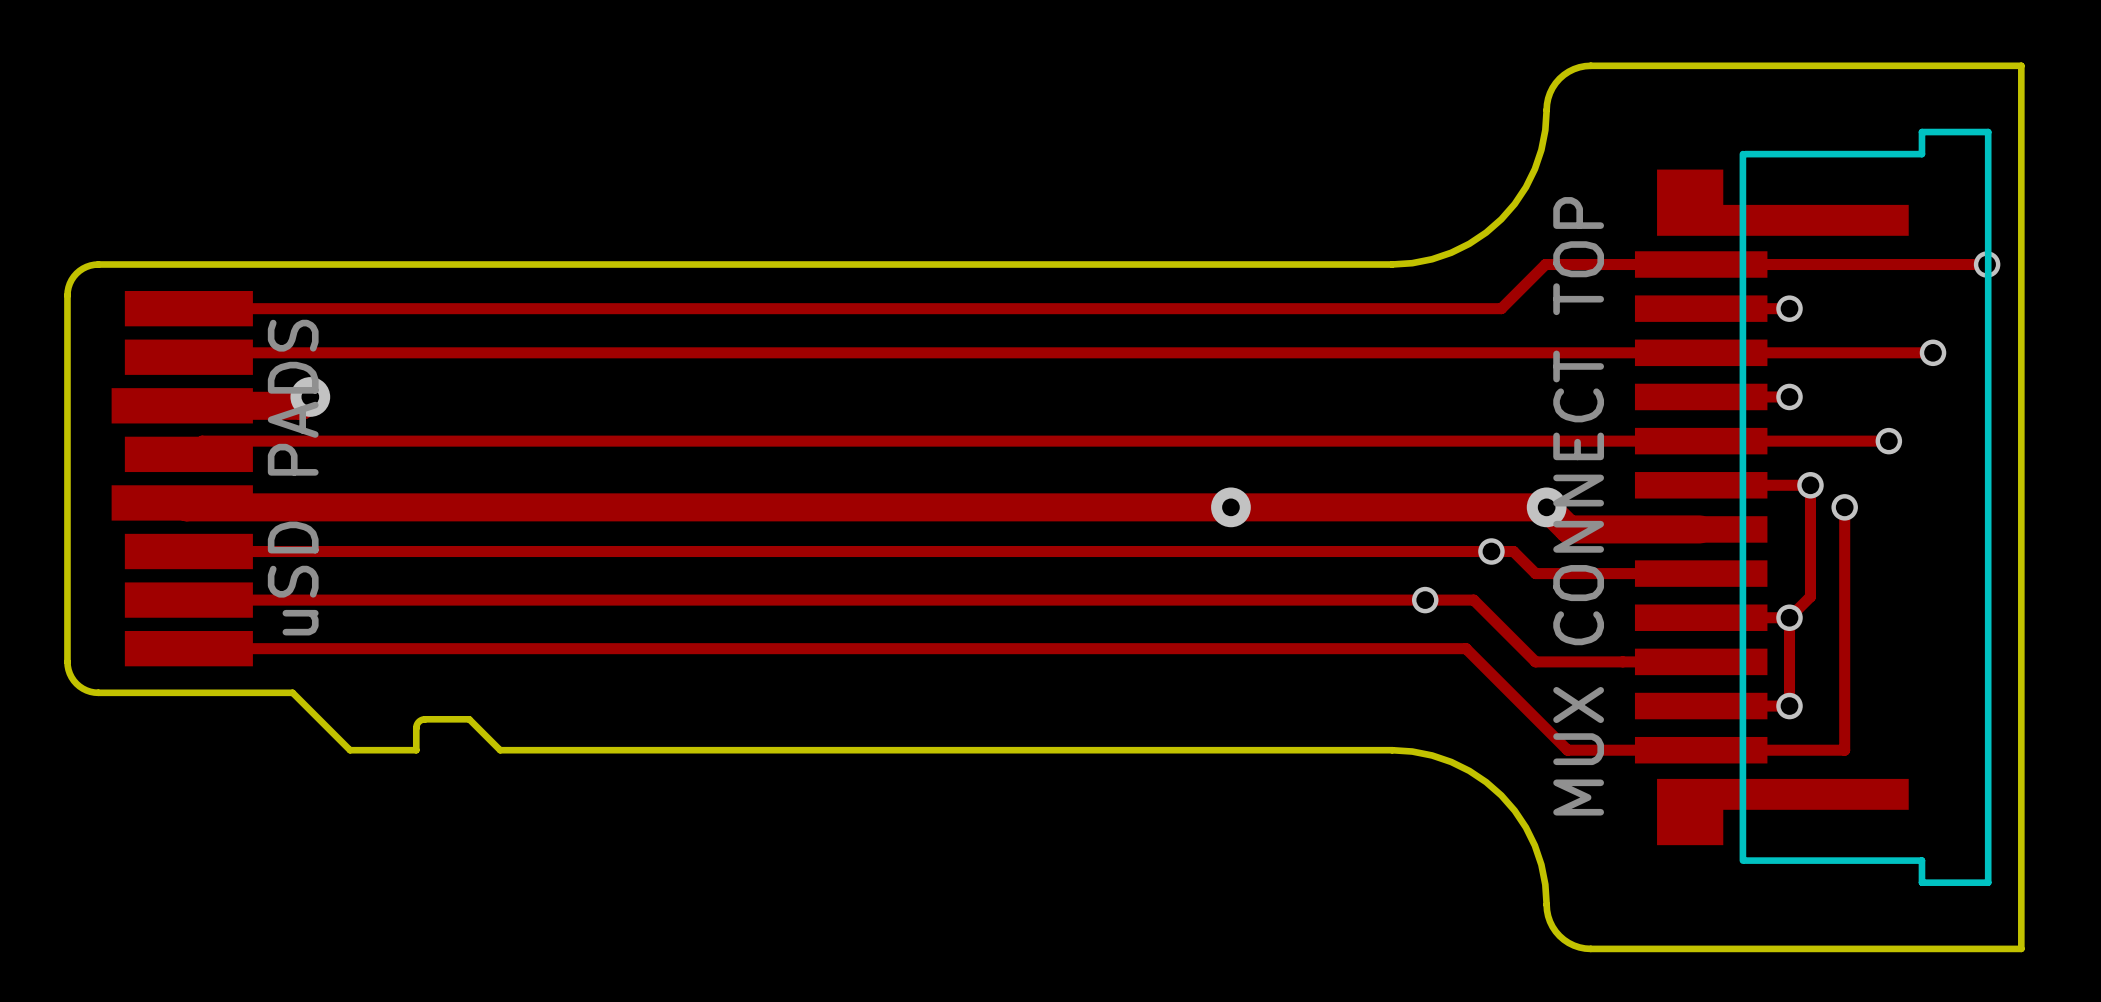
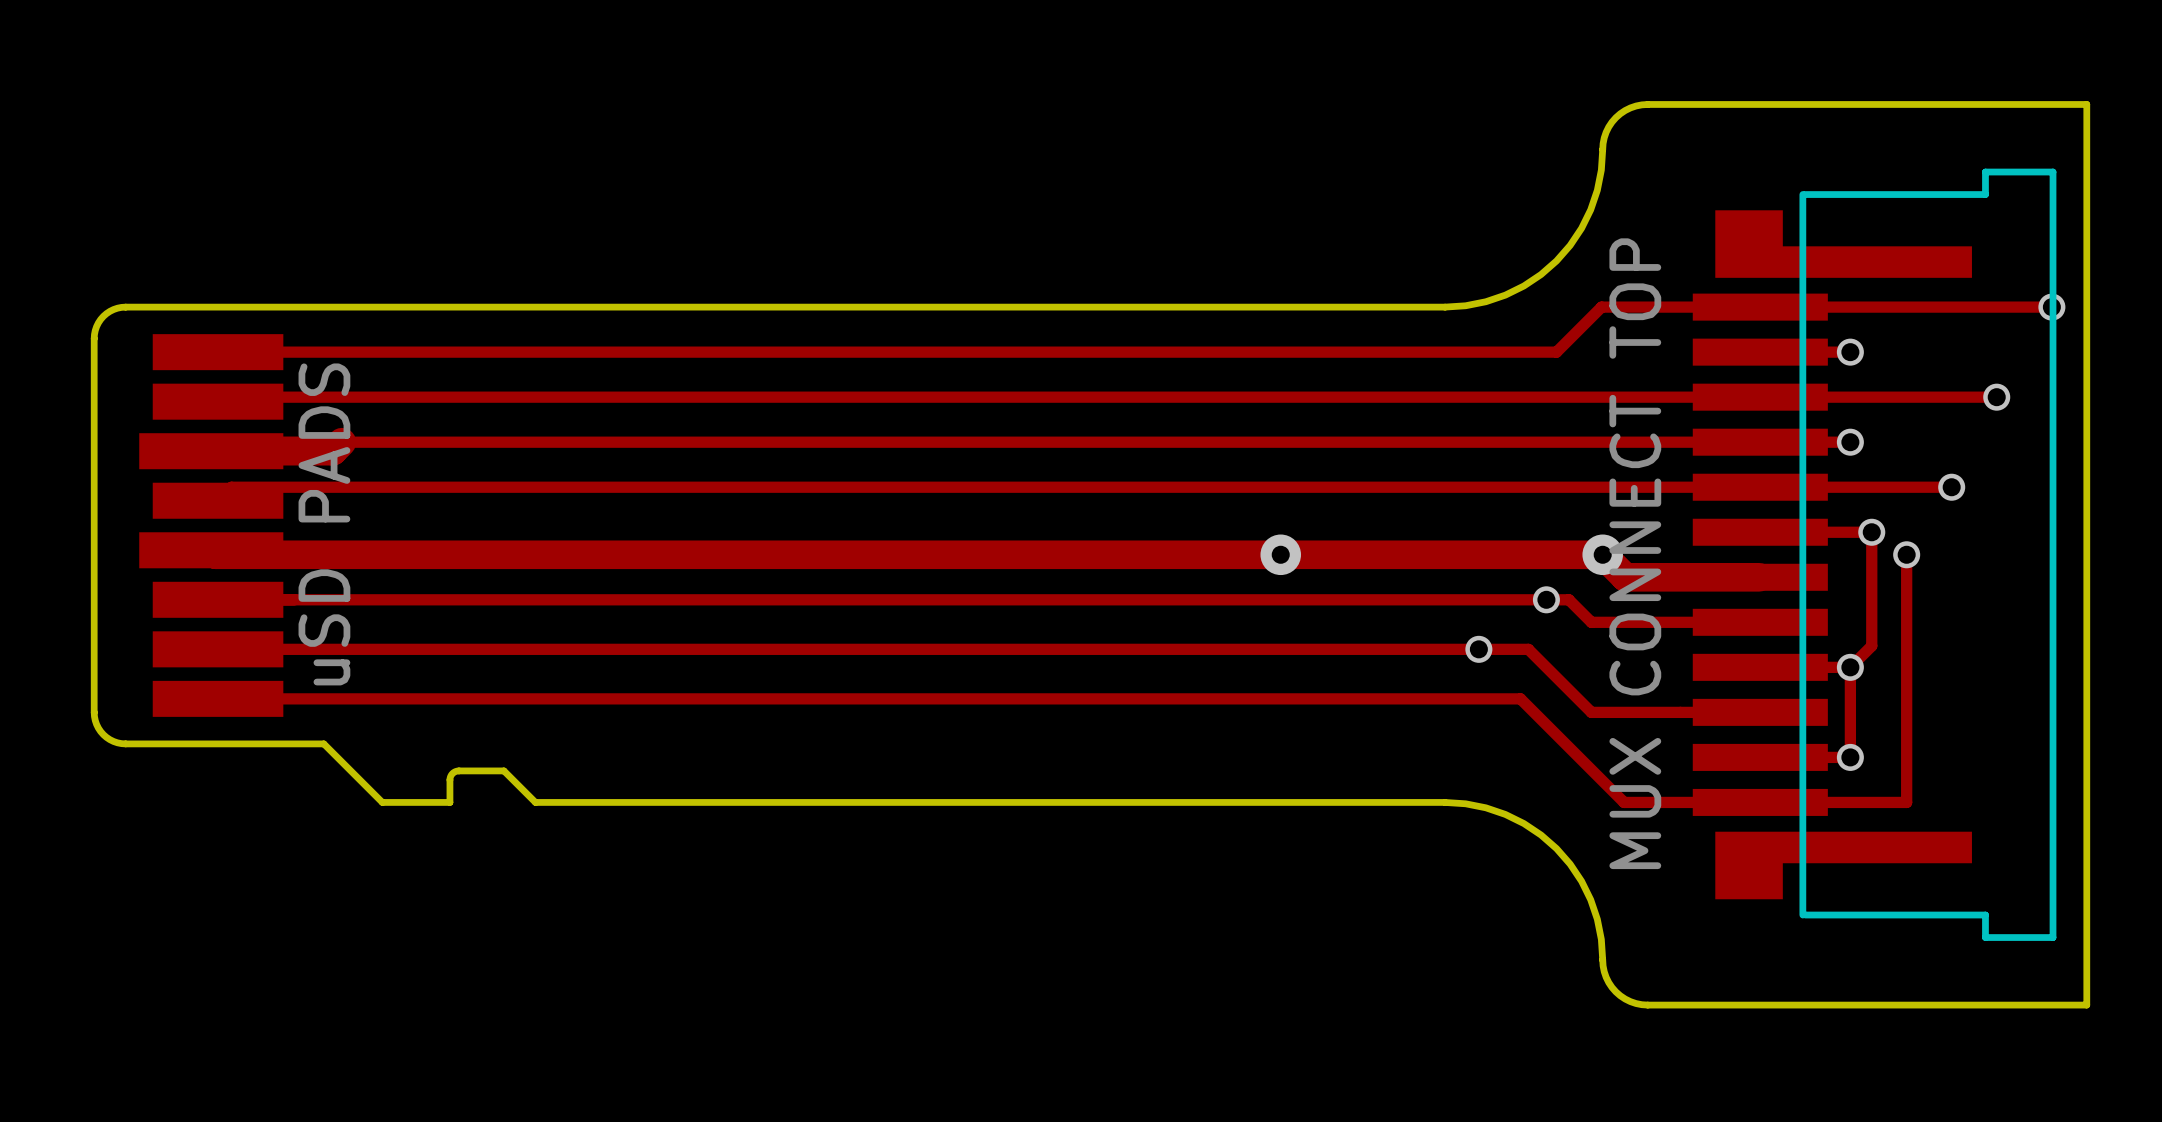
track: none -> (220, 442) (1759, 442)
via: (310, 396) -> none

